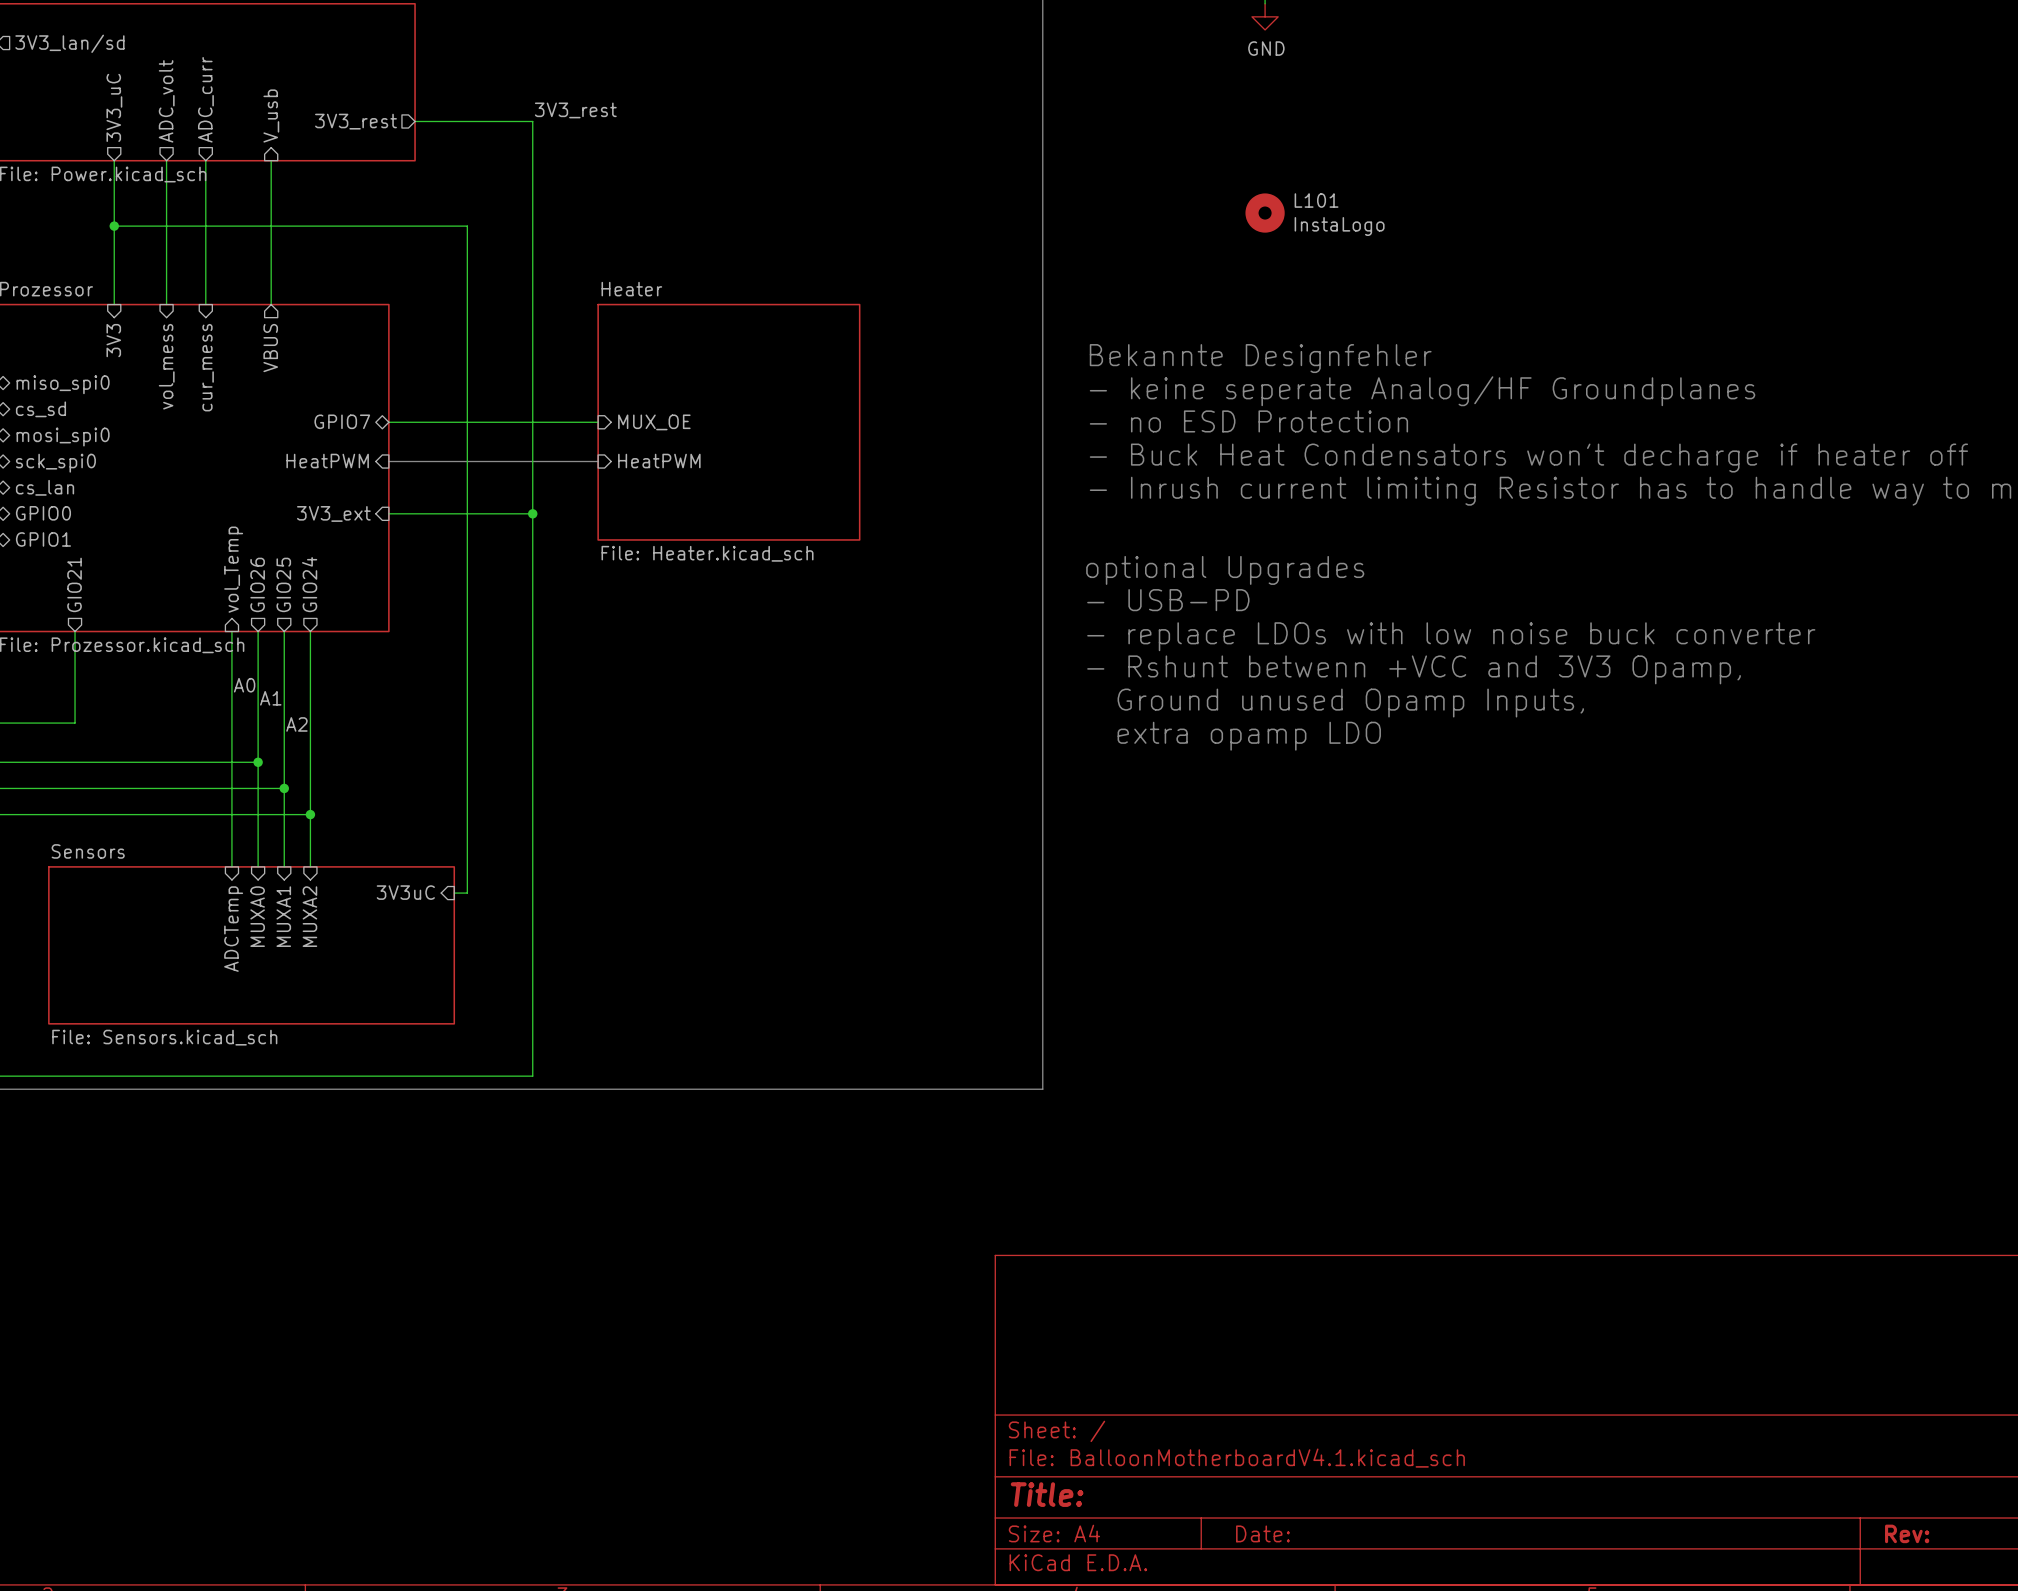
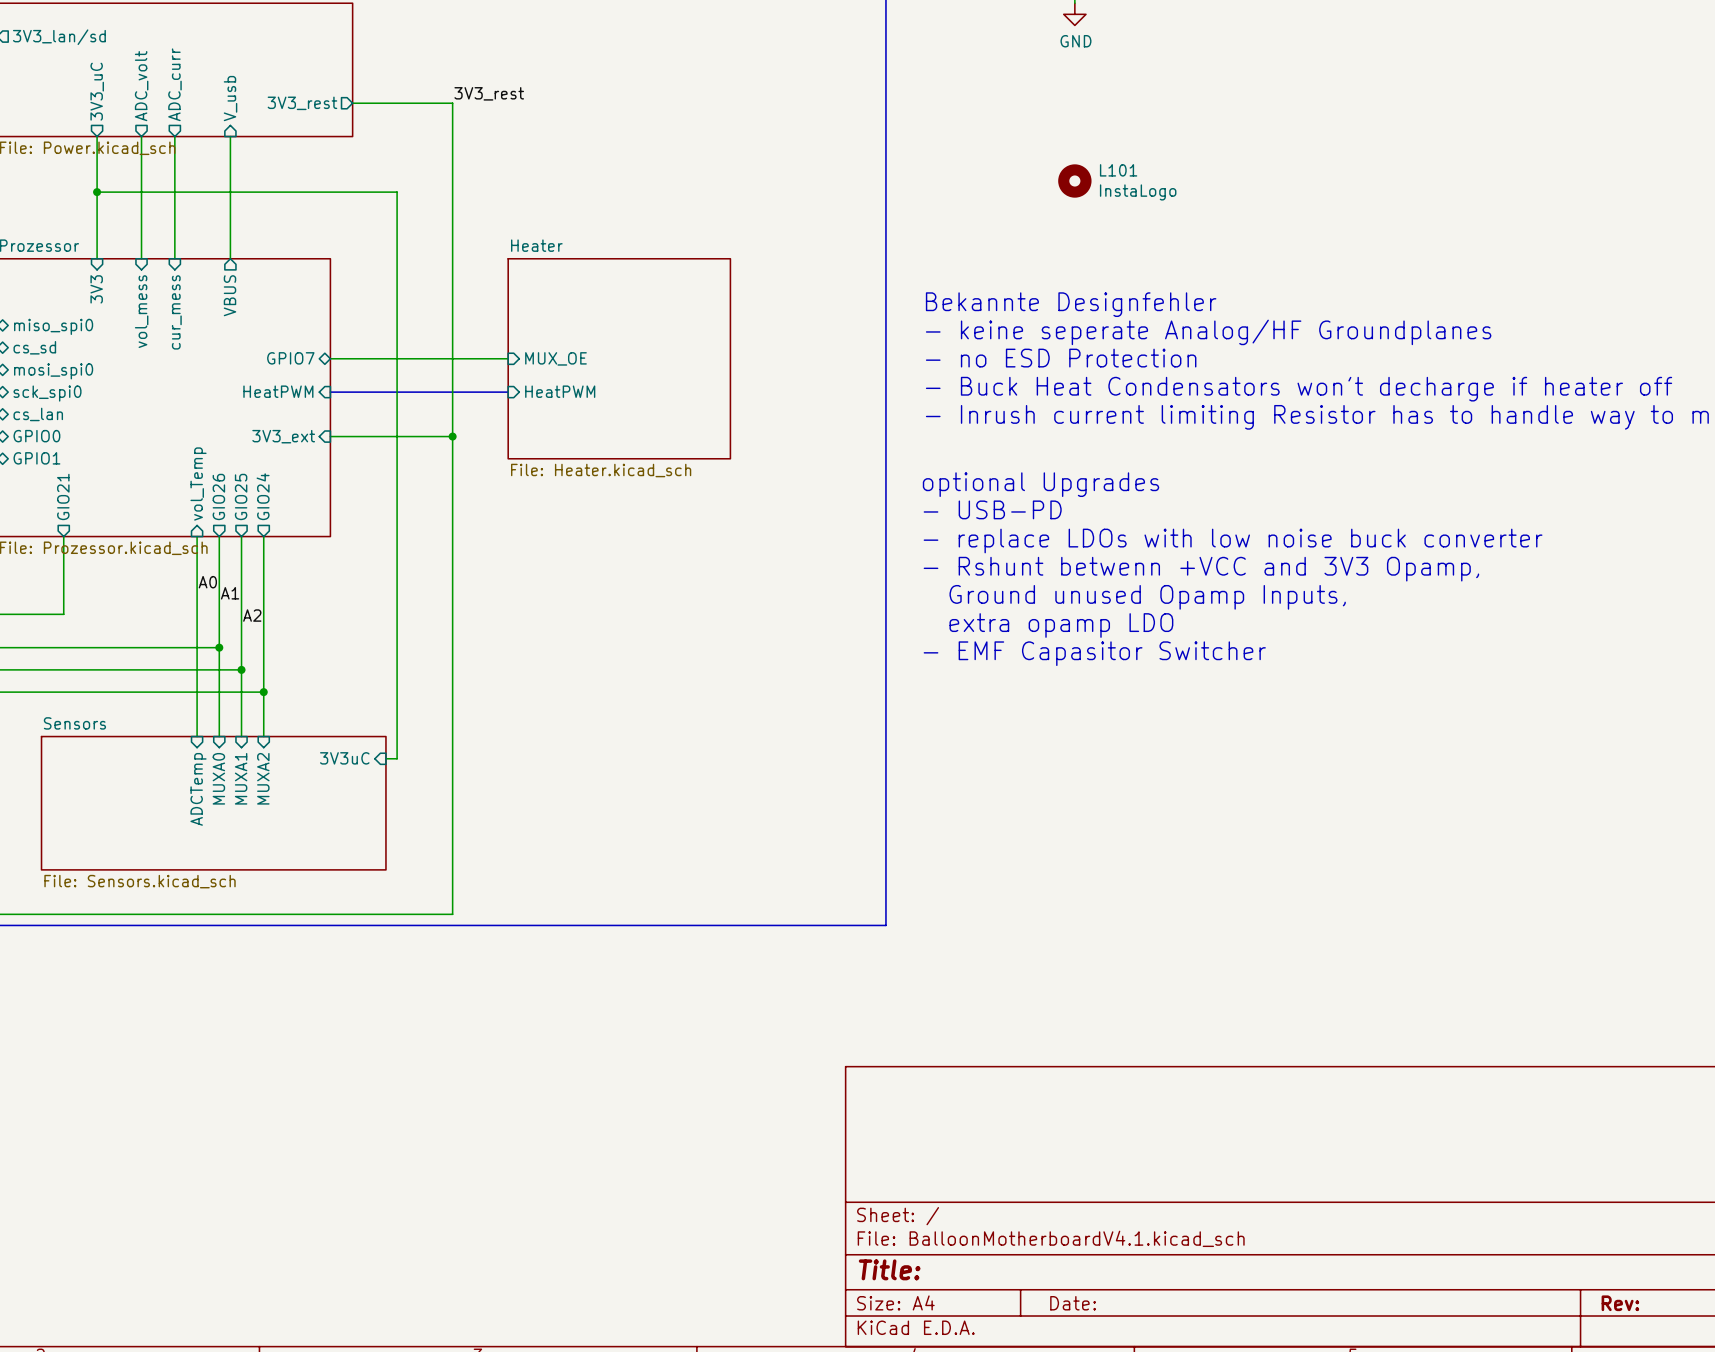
text: none -> - EMF Capasitor Switcher (1094, 653)

